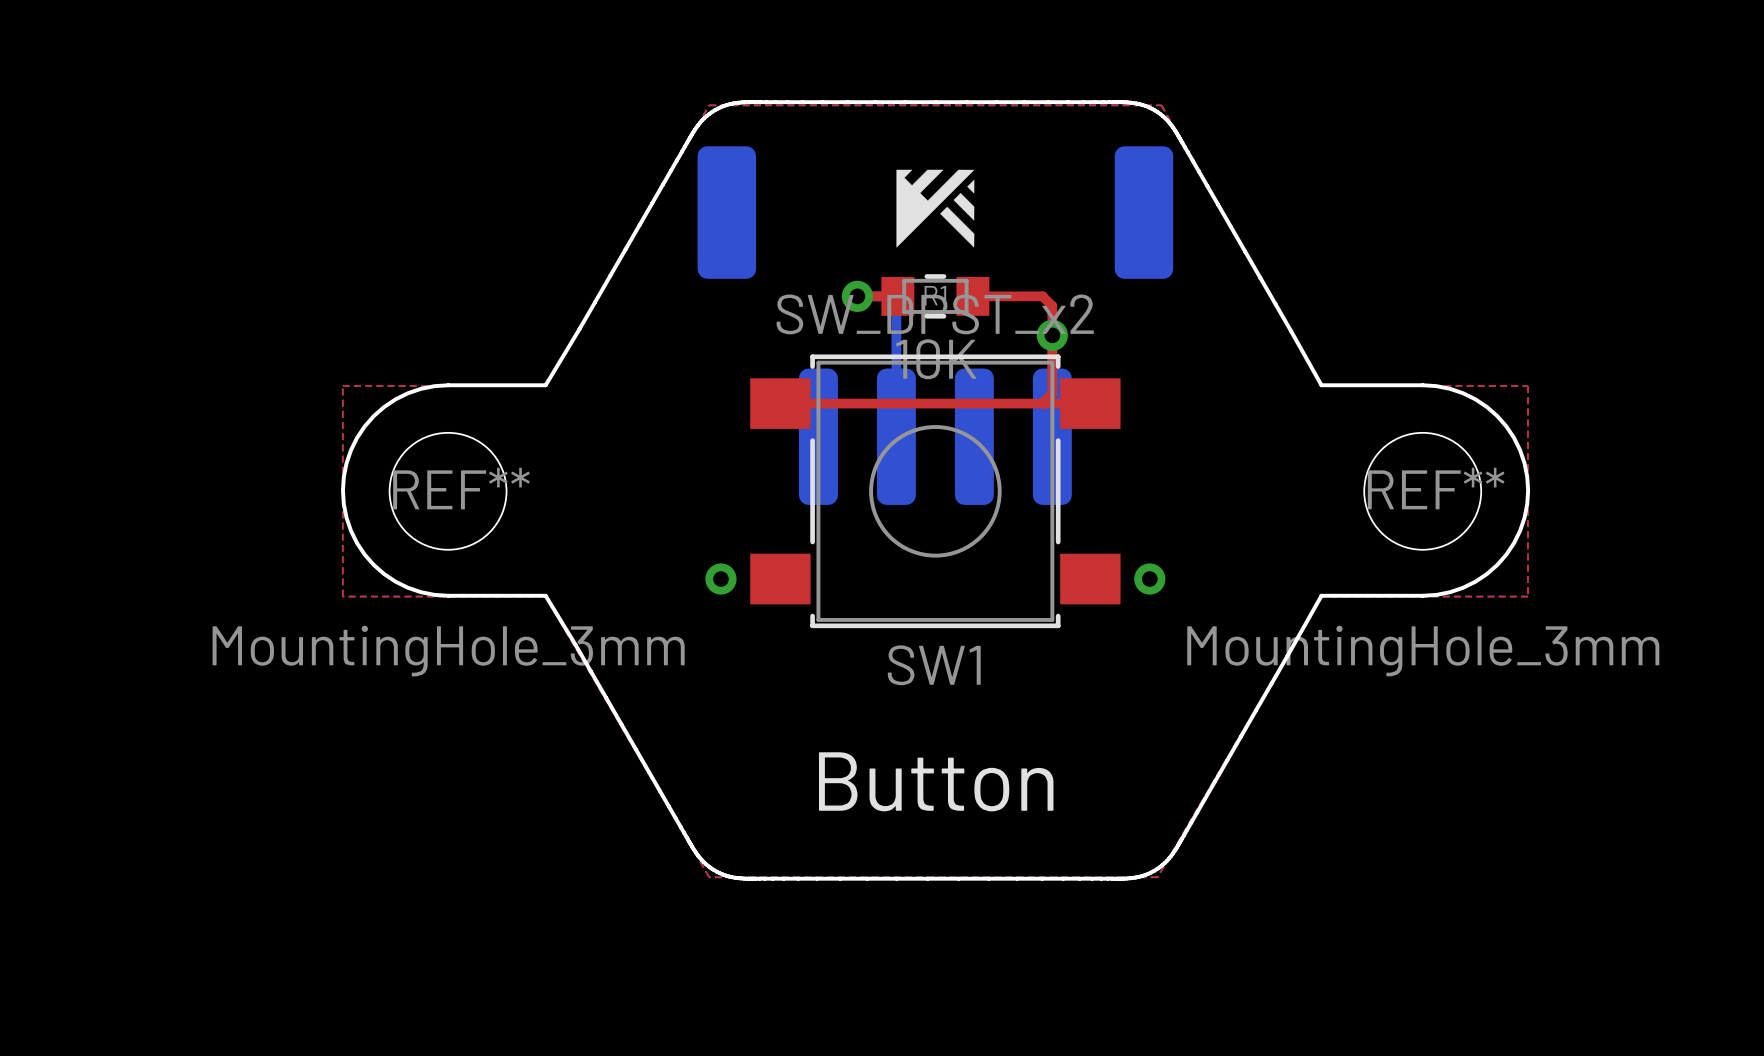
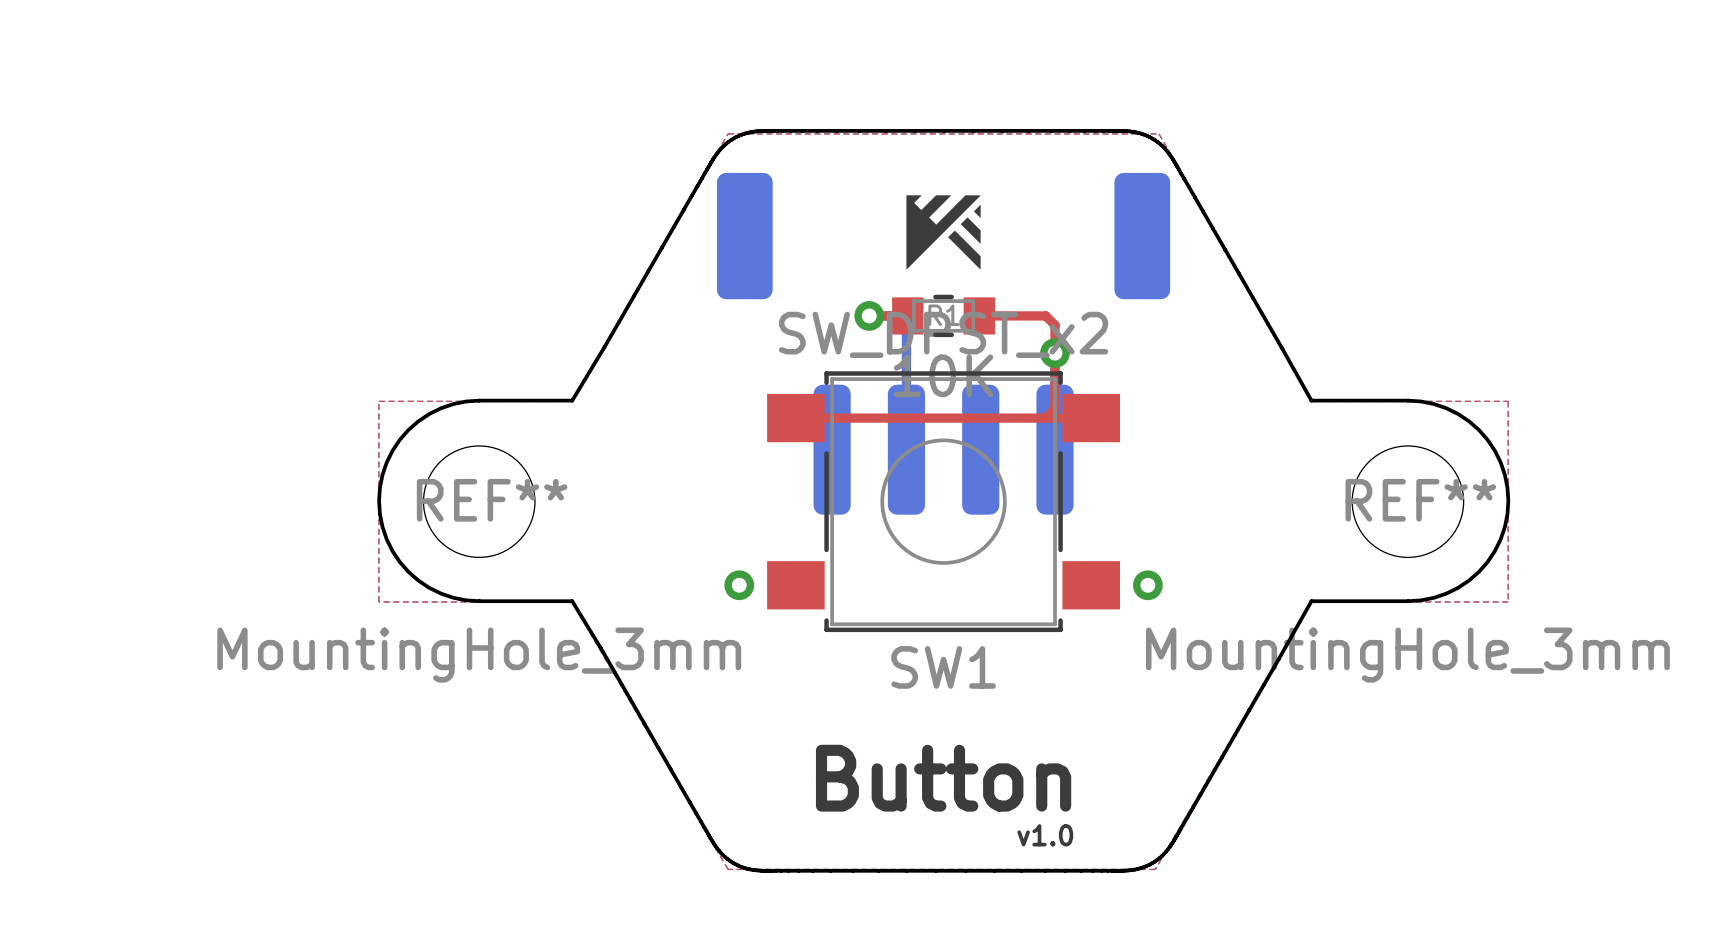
text: none -> v1.0 (1045, 835)

